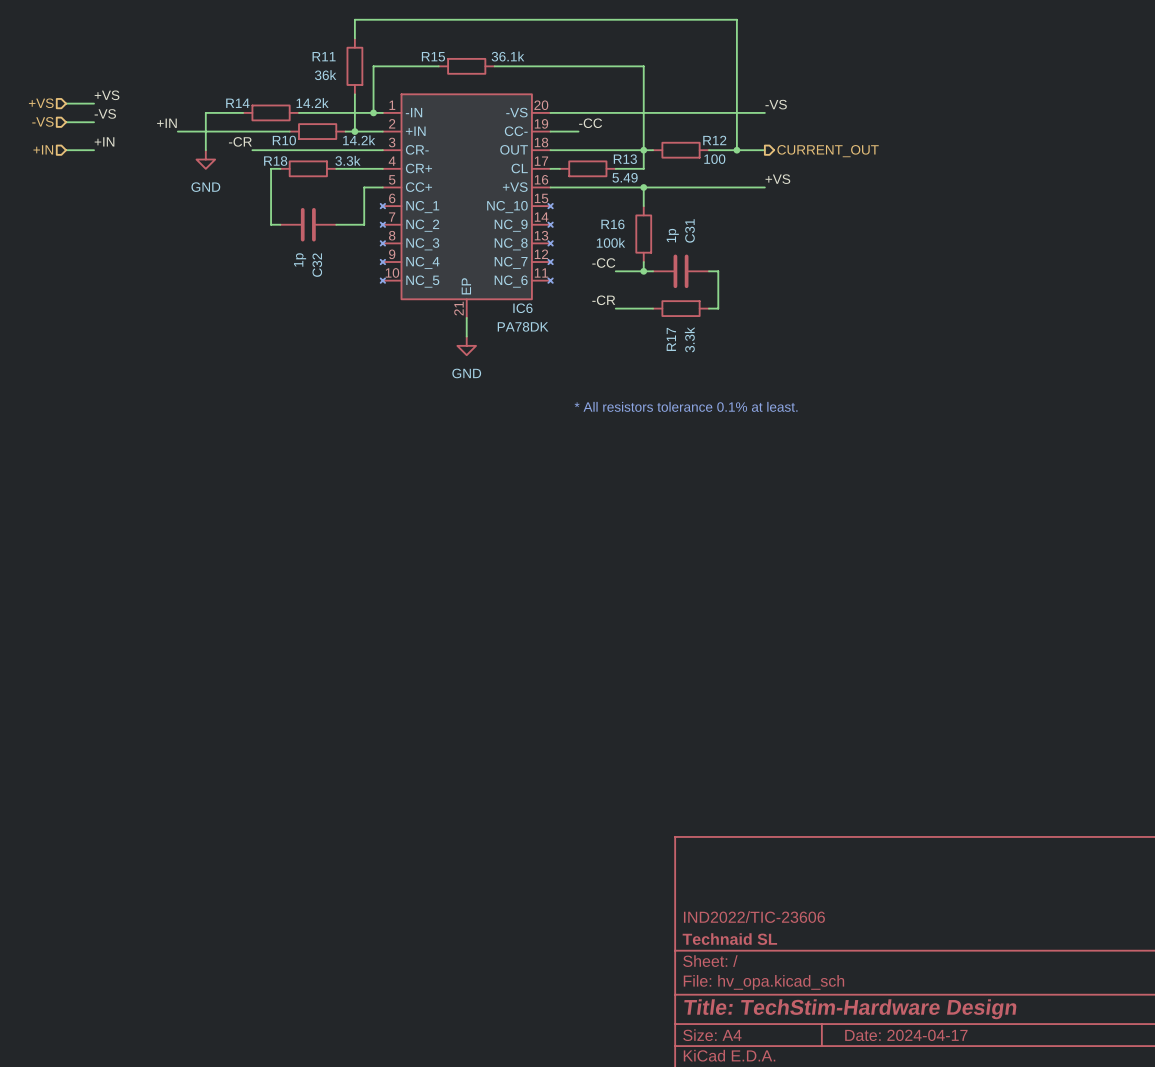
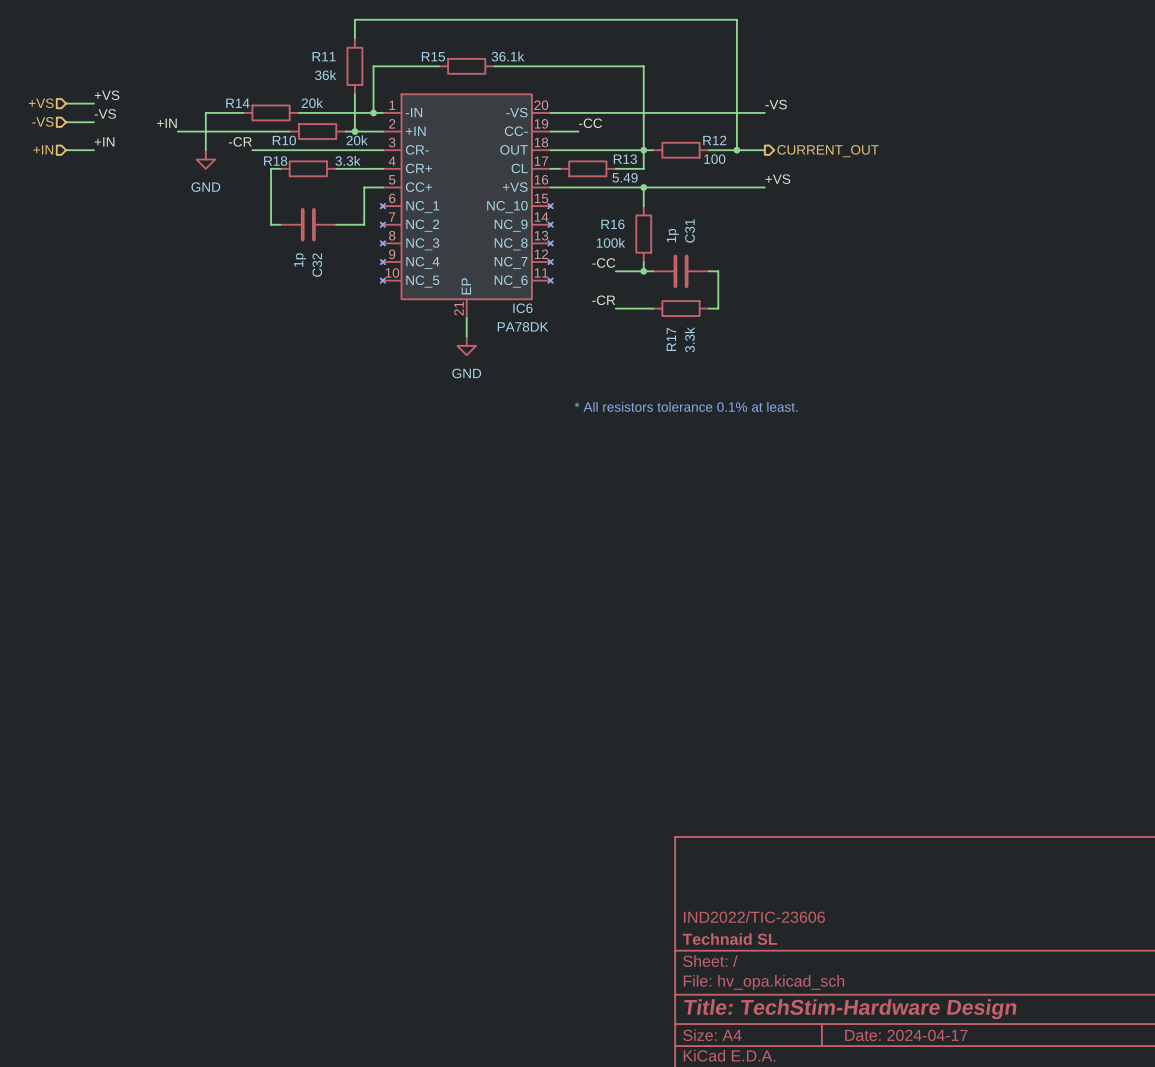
R14 value: 14.2k (312, 103) -> 20k (312, 103)
R10 value: 14.2k (359, 140) -> 20k (357, 140)

